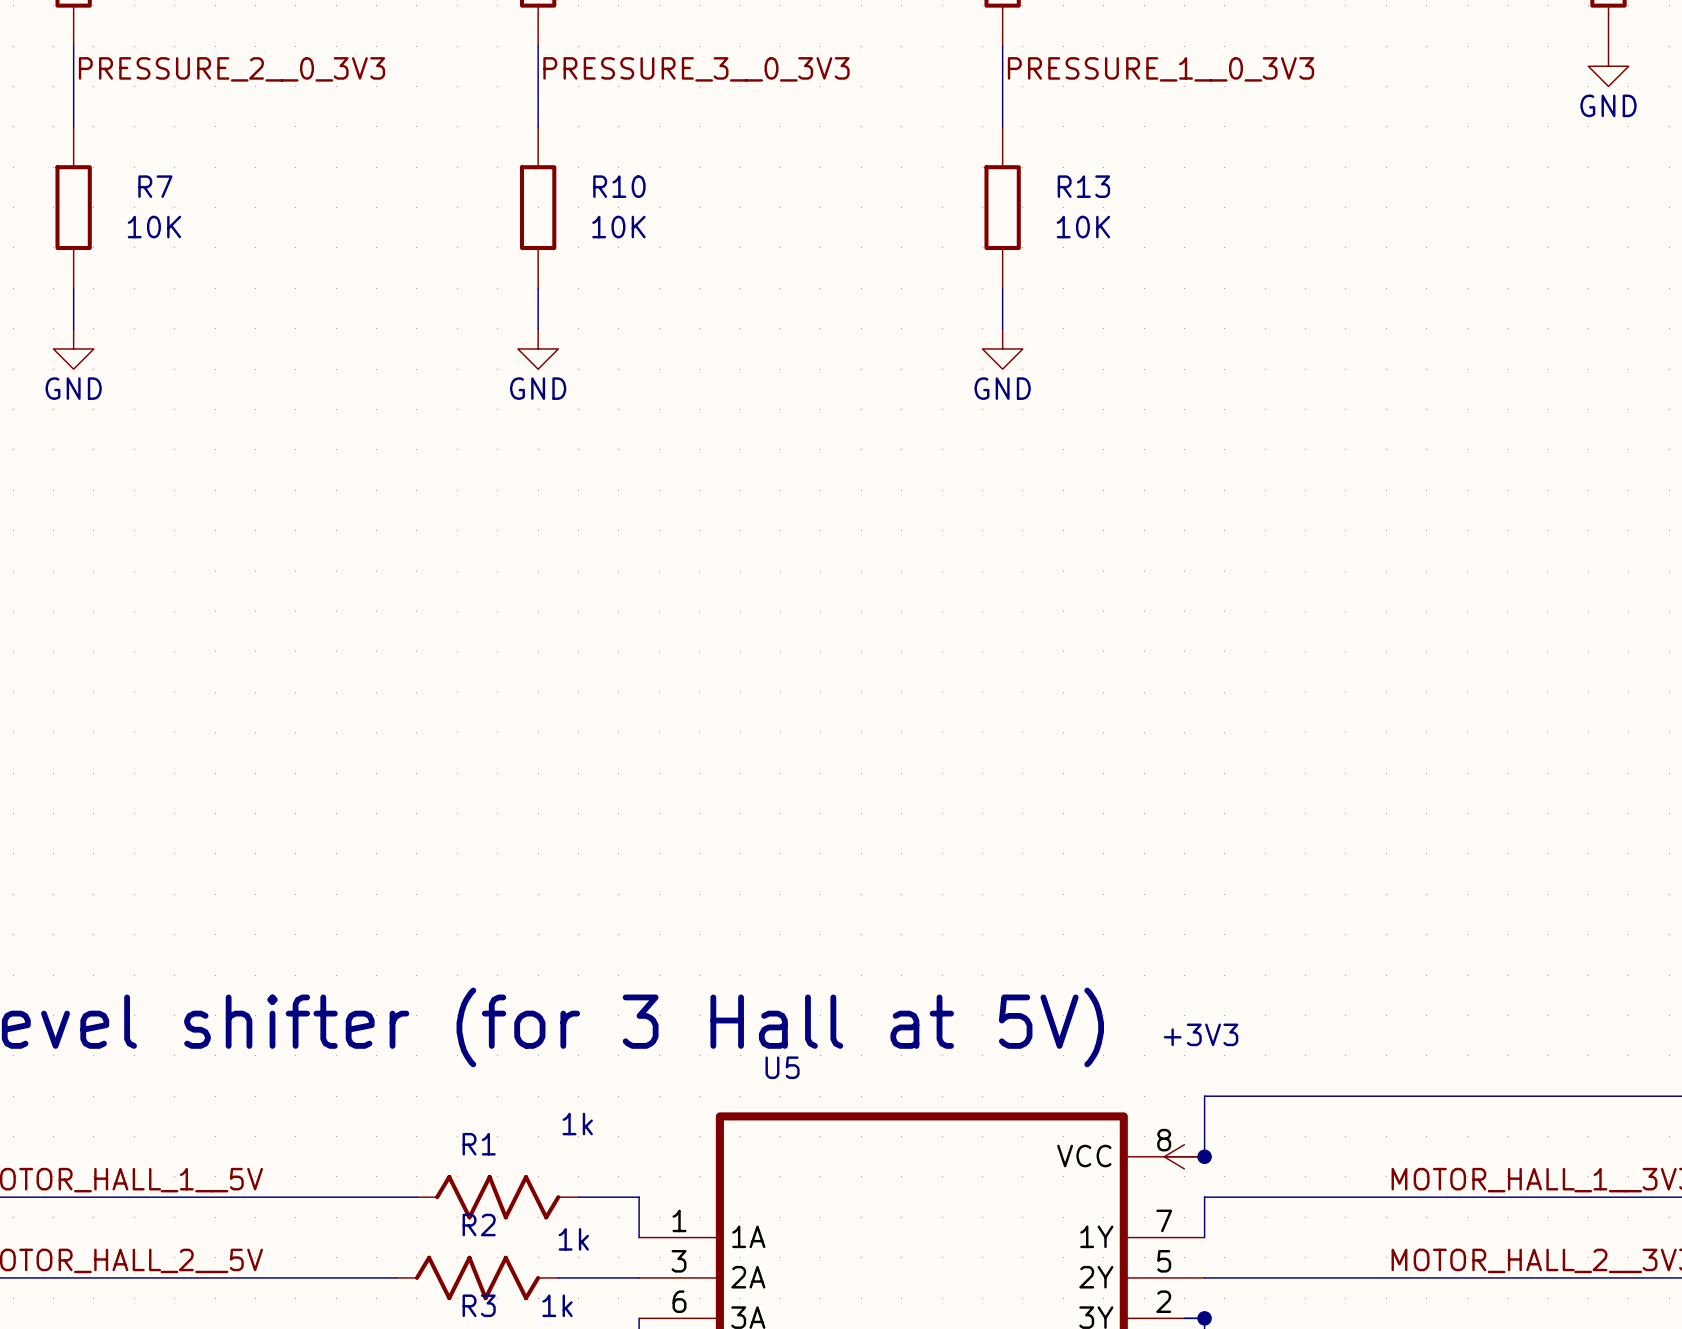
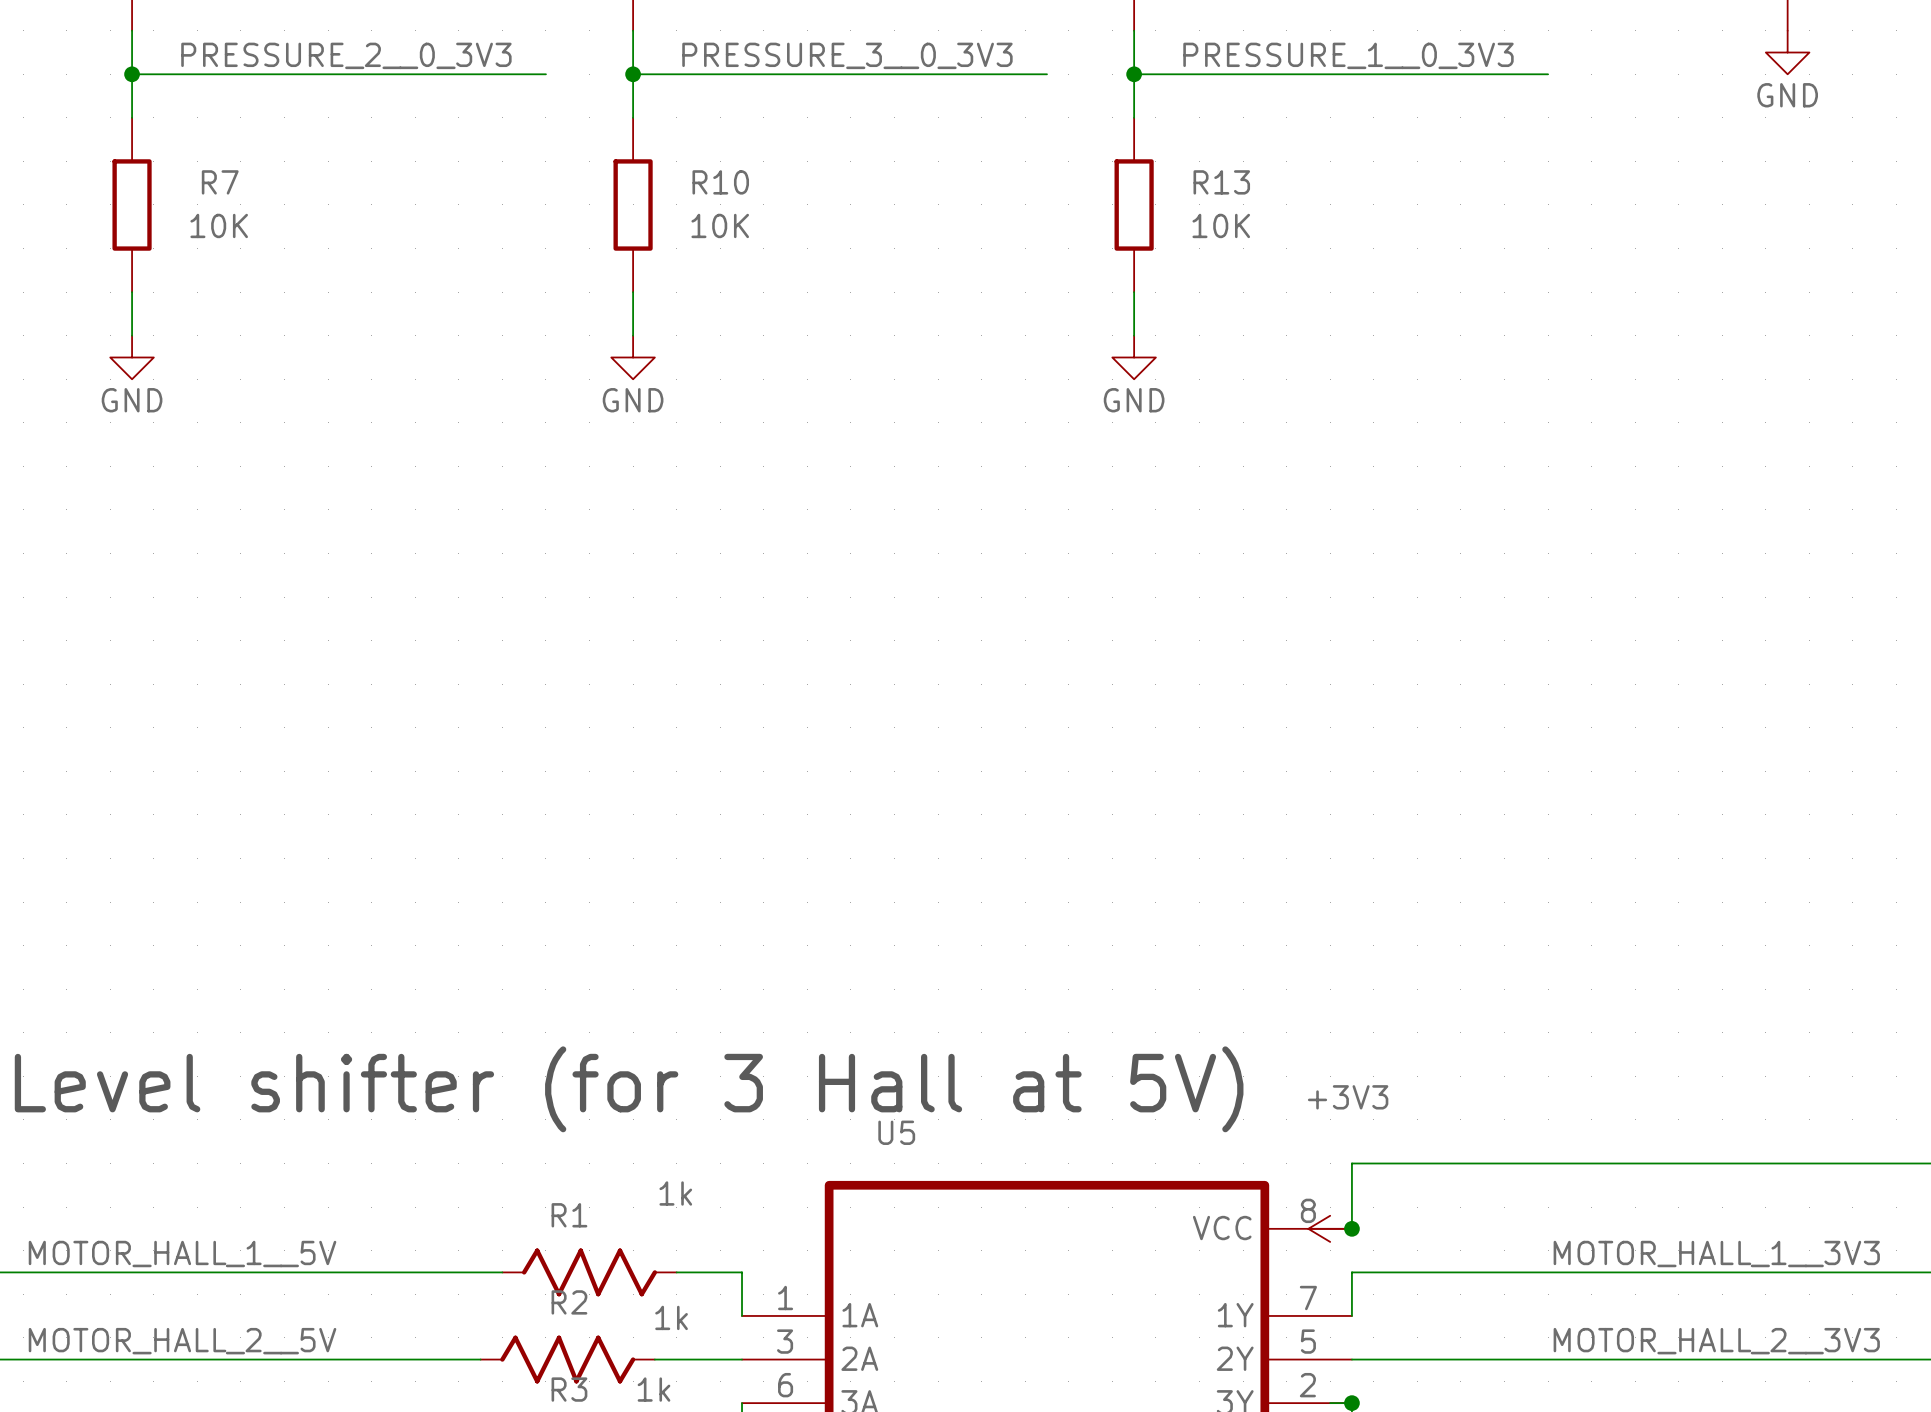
label position: PRESSURE_2__0_3V3 (231, 69) -> PRESSURE_2__0_3V3 (346, 55)
label position: PRESSURE_3__0_3V3 (696, 69) -> PRESSURE_3__0_3V3 (847, 55)
label position: PRESSURE_1__0_3V3 (1160, 69) -> PRESSURE_1__0_3V3 (1348, 55)
wire: none -> (132, 74) (545, 74)
junction: none -> (132, 74)
wire: none -> (633, 74) (1046, 74)
junction: none -> (633, 74)
wire: none -> (1134, 74) (1548, 74)
junction: none -> (1134, 74)

